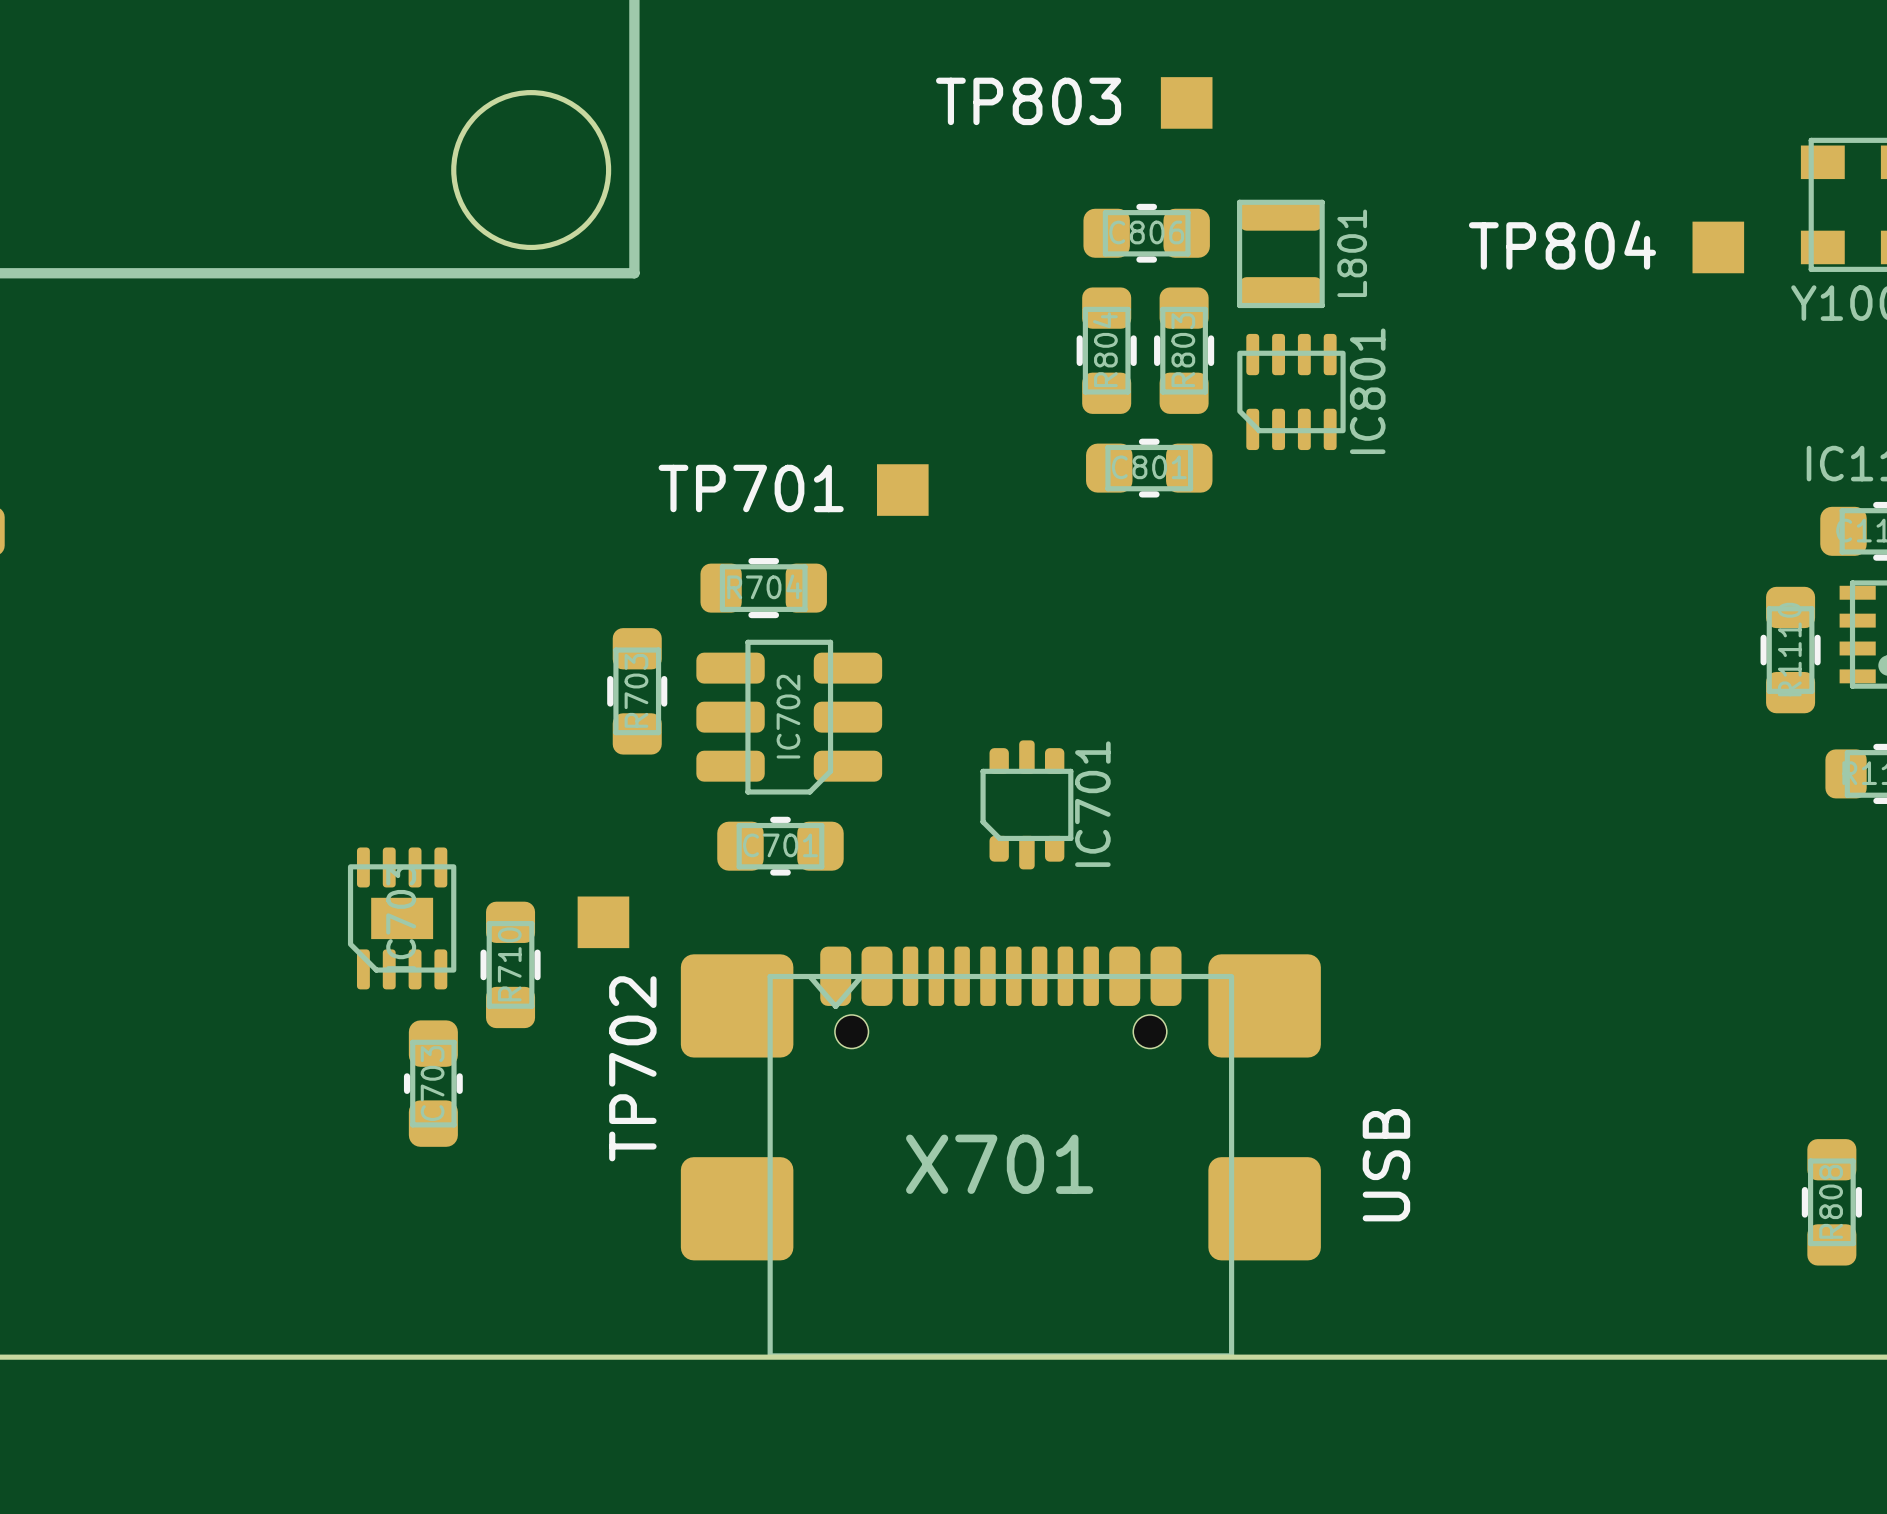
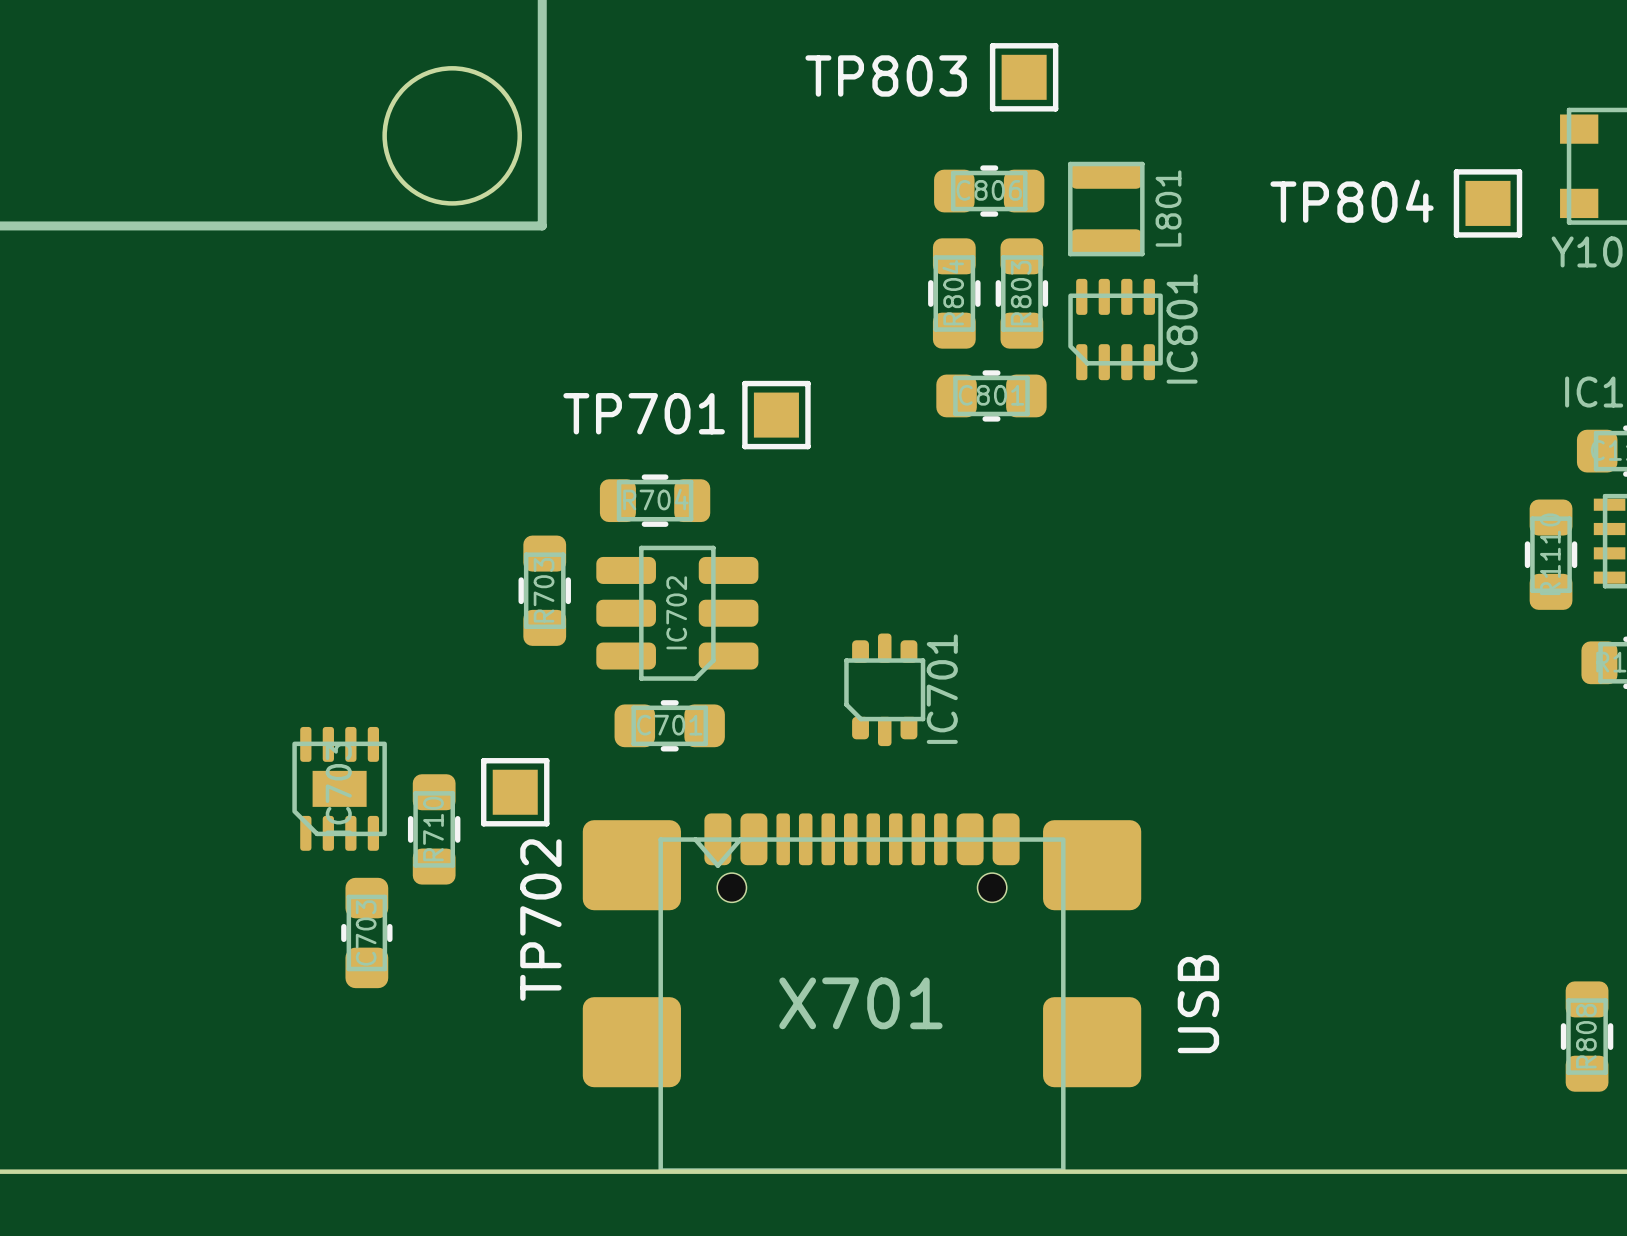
TP803 footprint: [1160, 77, 1213, 129] -> [989, 43, 1059, 112]
TP804 footprint: [1692, 221, 1745, 274] -> [1453, 169, 1523, 238]
TP701 footprint: [876, 464, 929, 516] -> [742, 380, 811, 450]
TP702 footprint: [577, 896, 630, 949] -> [481, 758, 550, 827]

